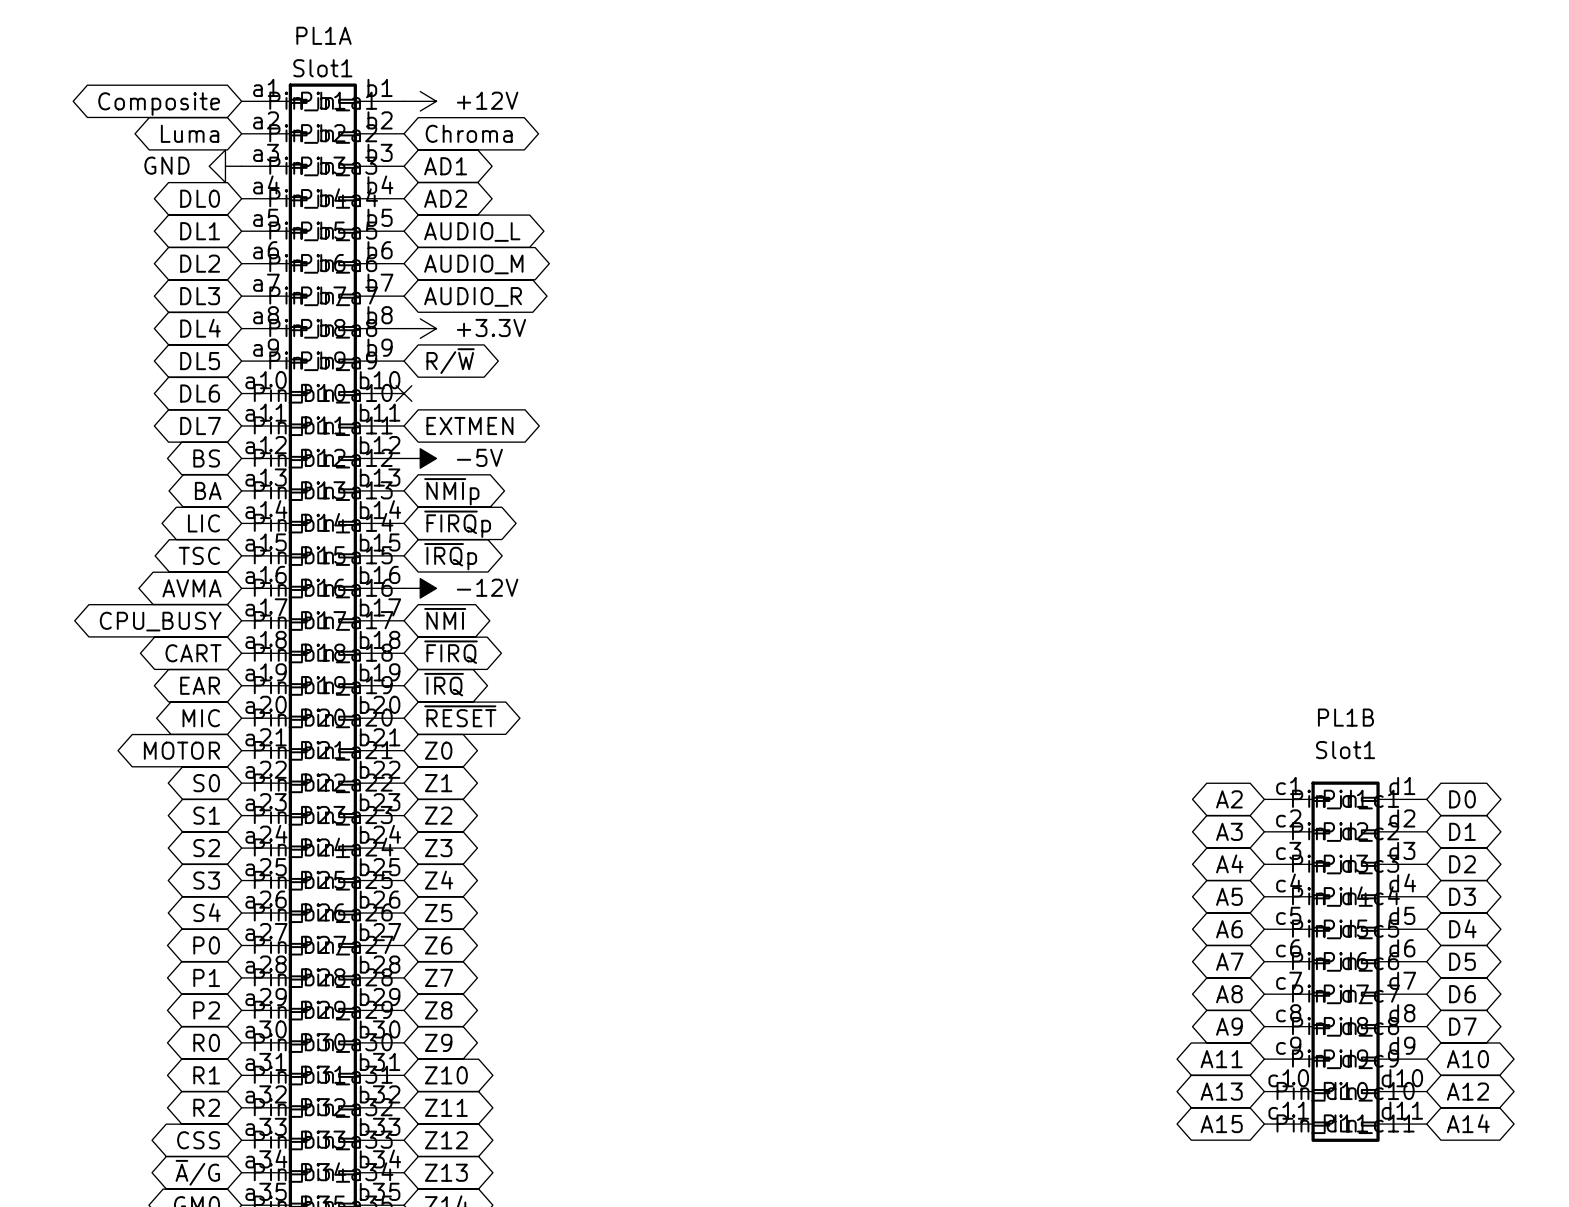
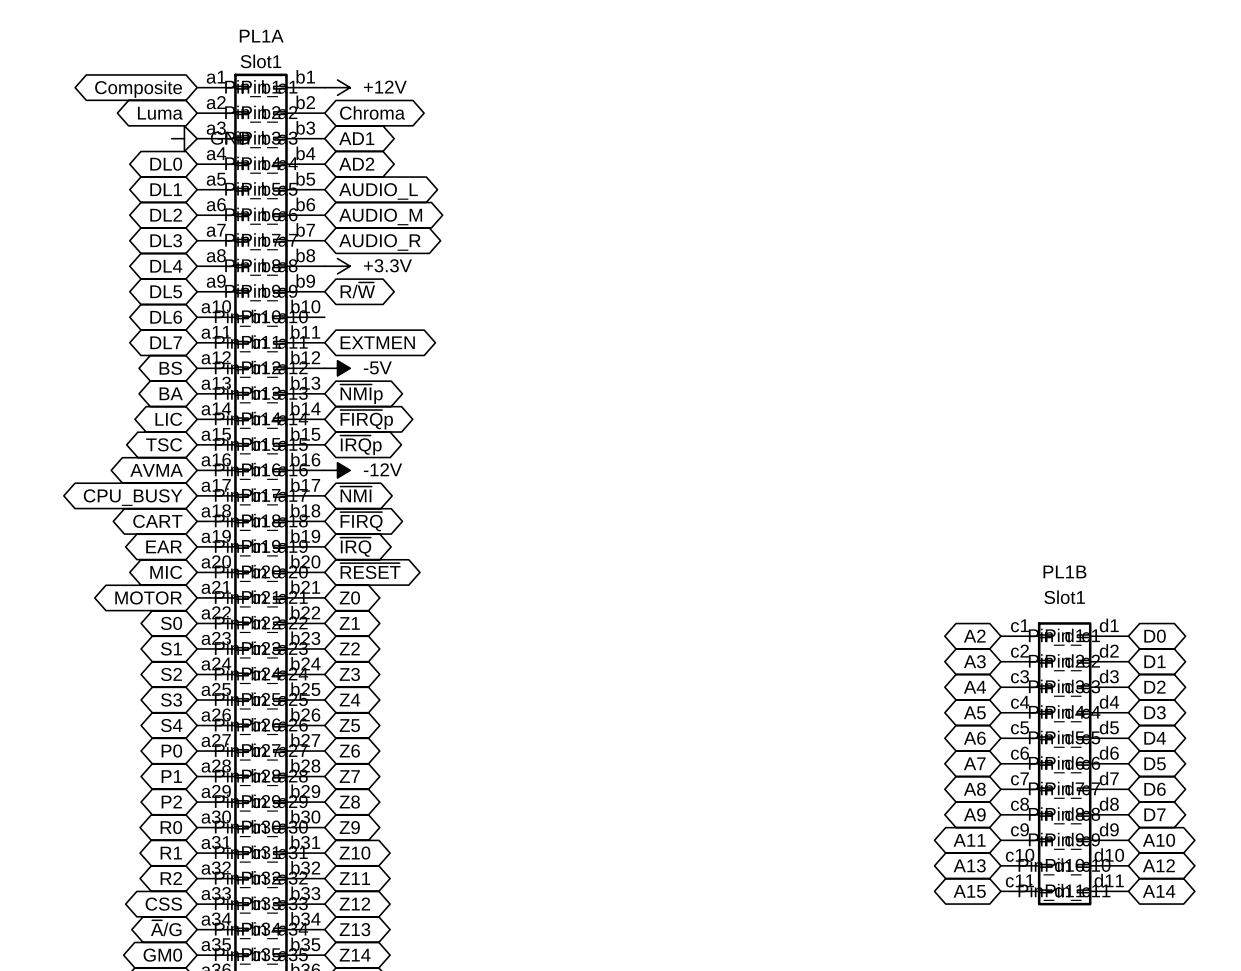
power symbol rotation: 0° (225, 166) -> 180° (184, 138)
no-connect mark: (404, 393) -> none

